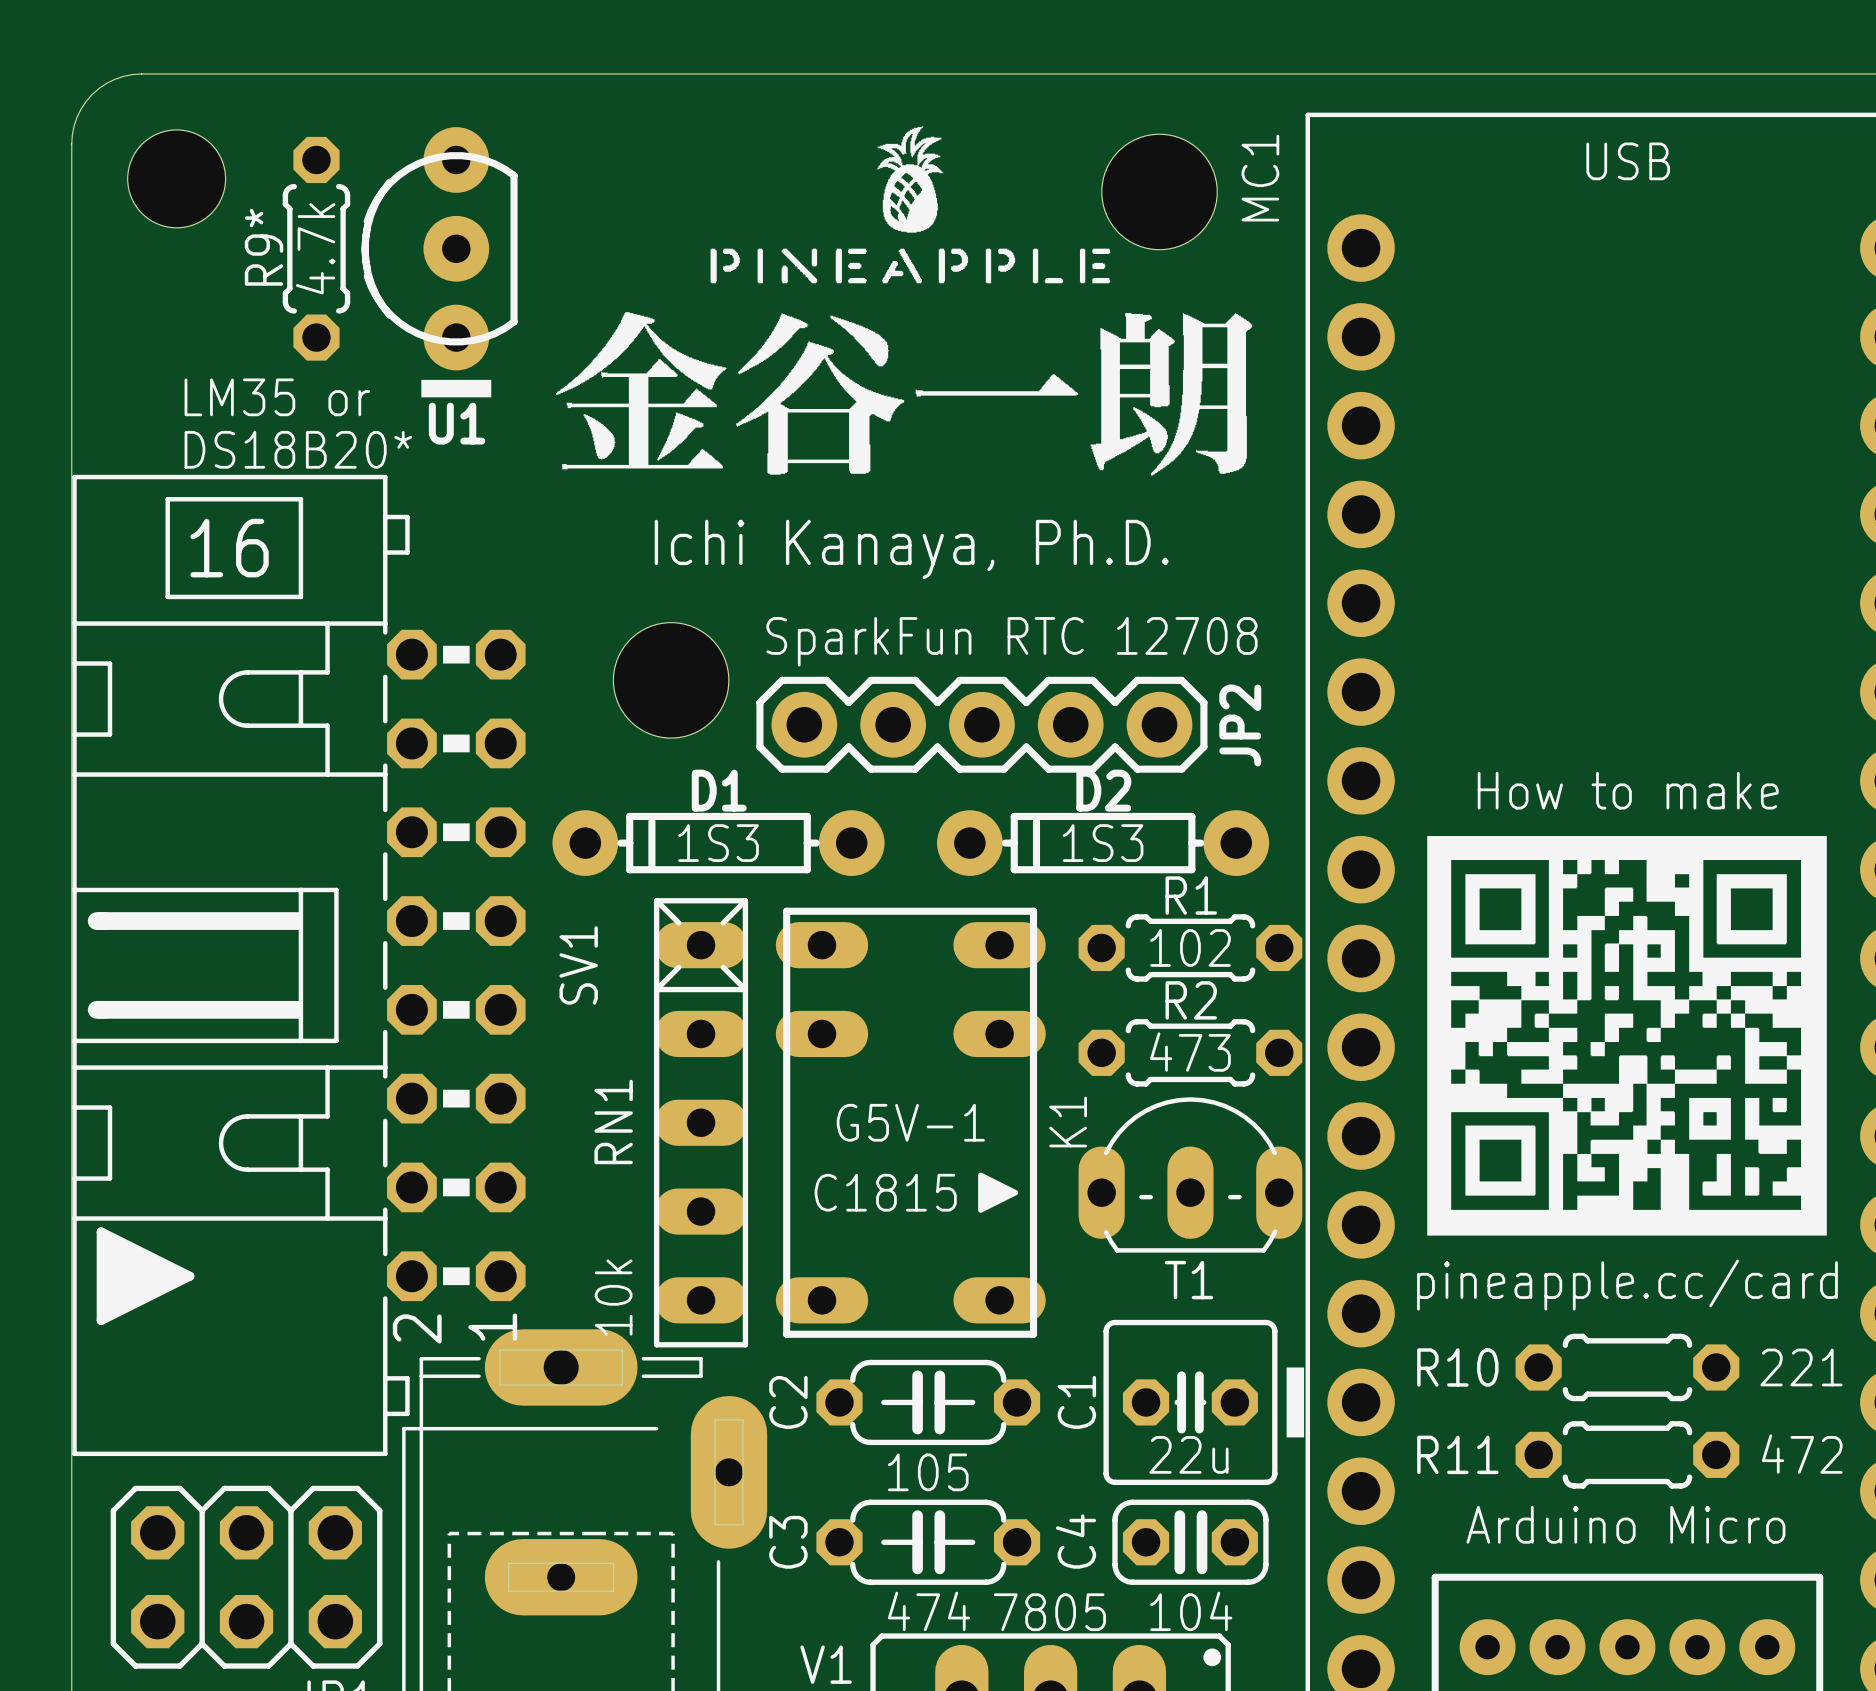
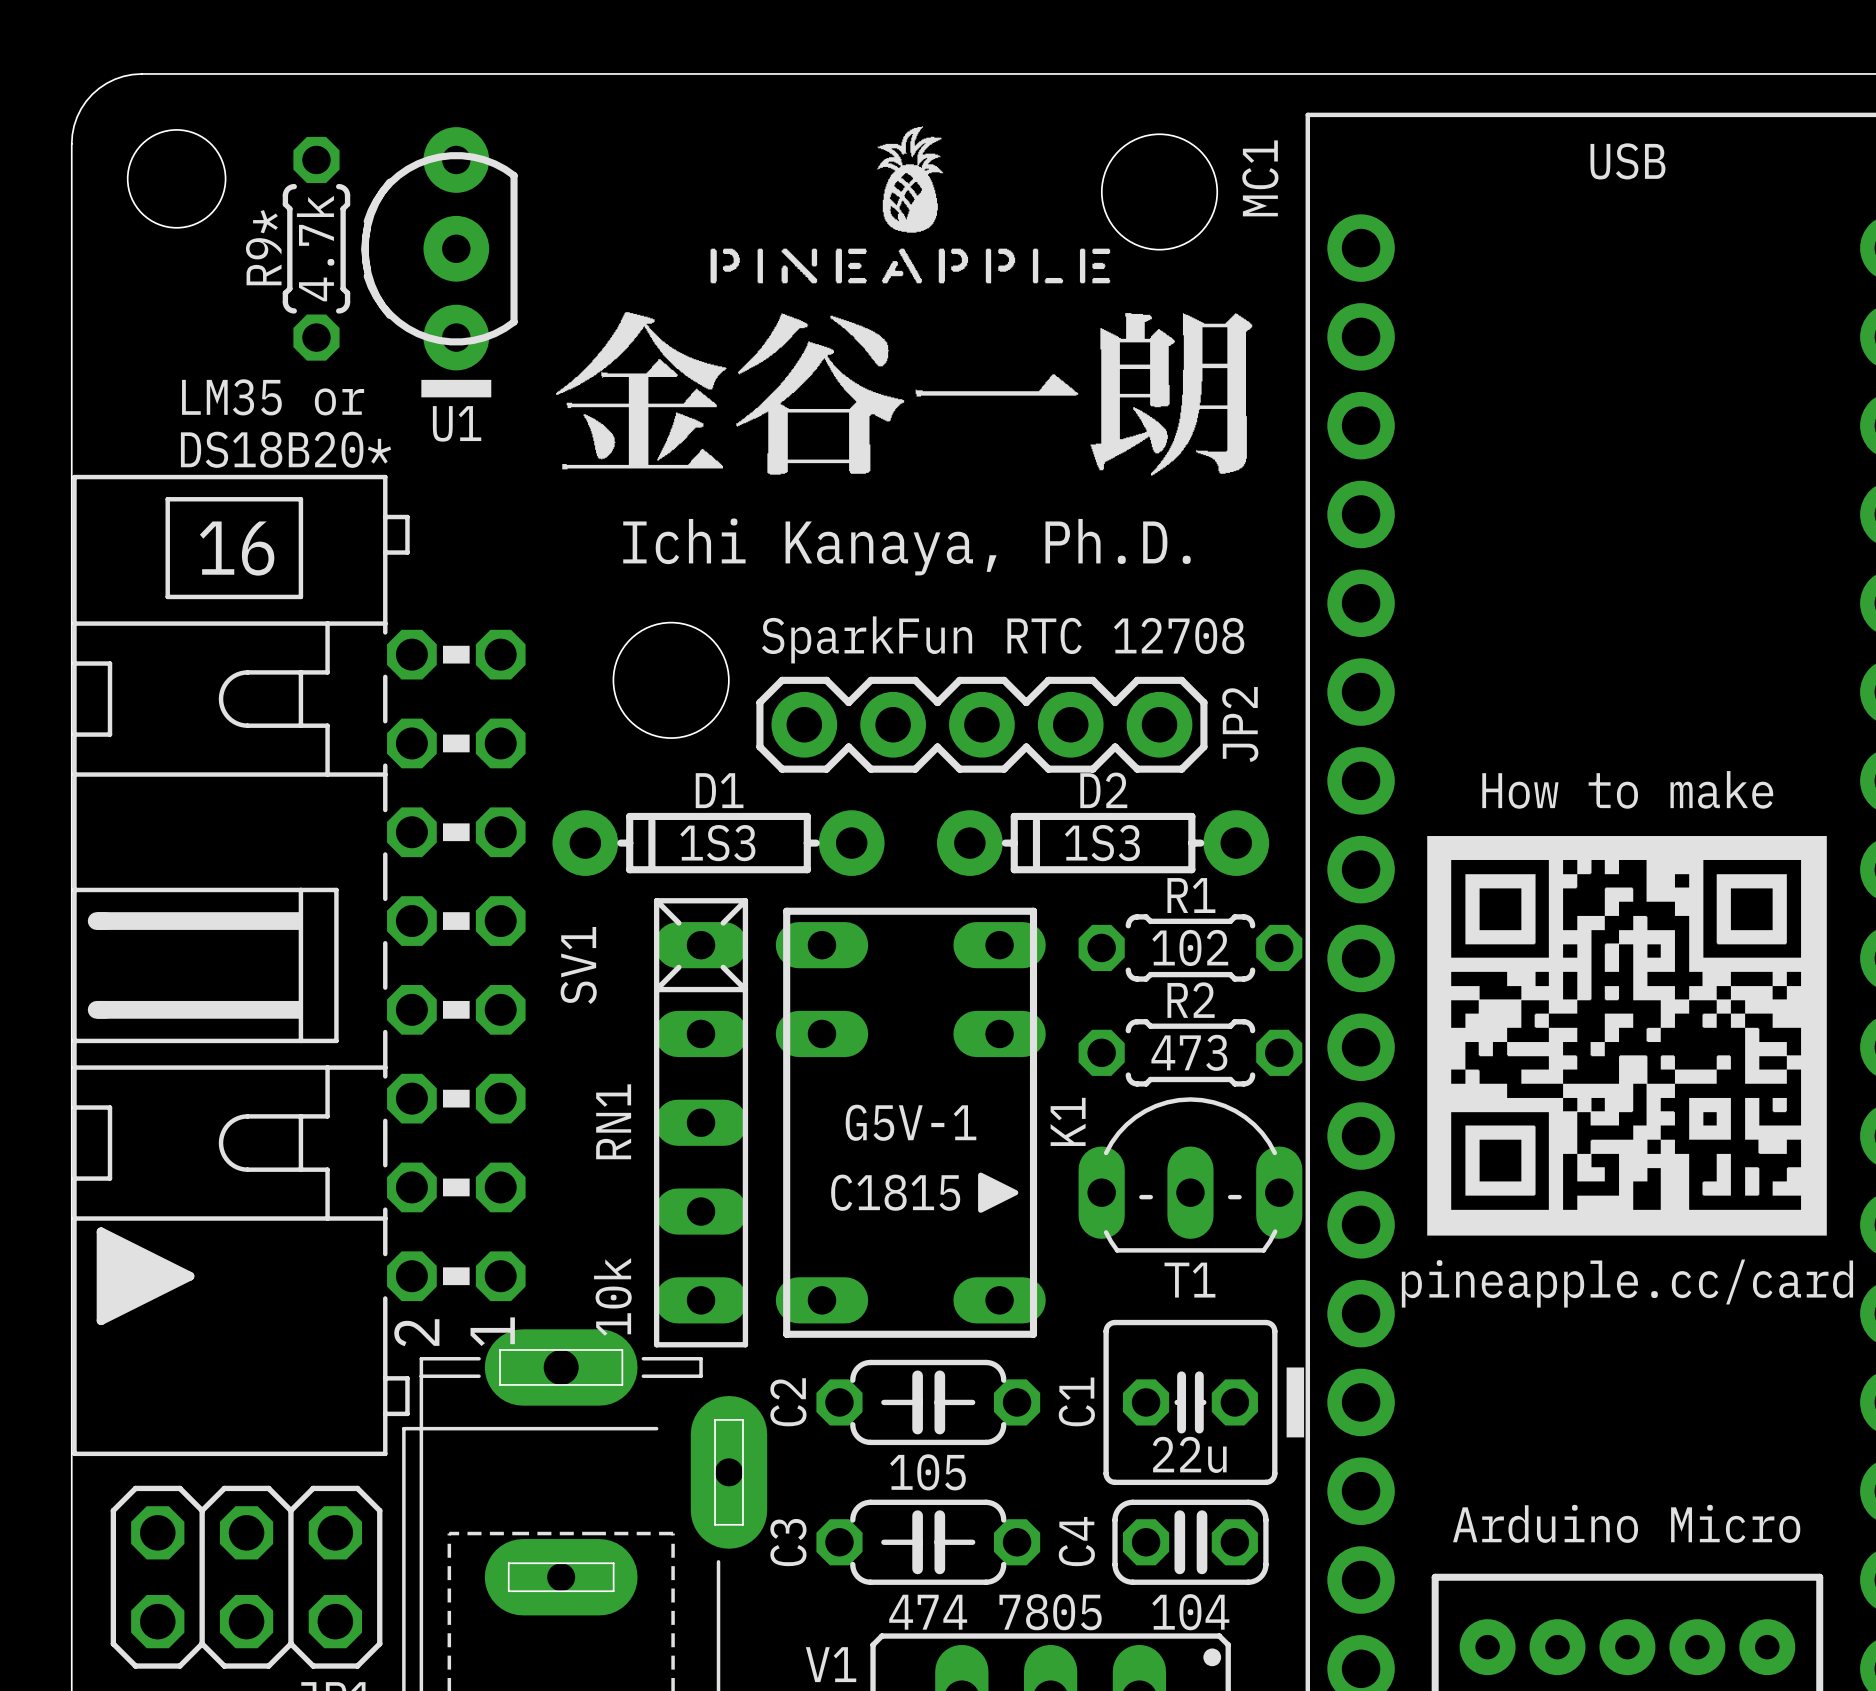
R10: (1627, 1367) -> none
text: 221 (1801, 1367) -> none
R11: (1627, 1454) -> none
text: 472 (1802, 1454) -> none

